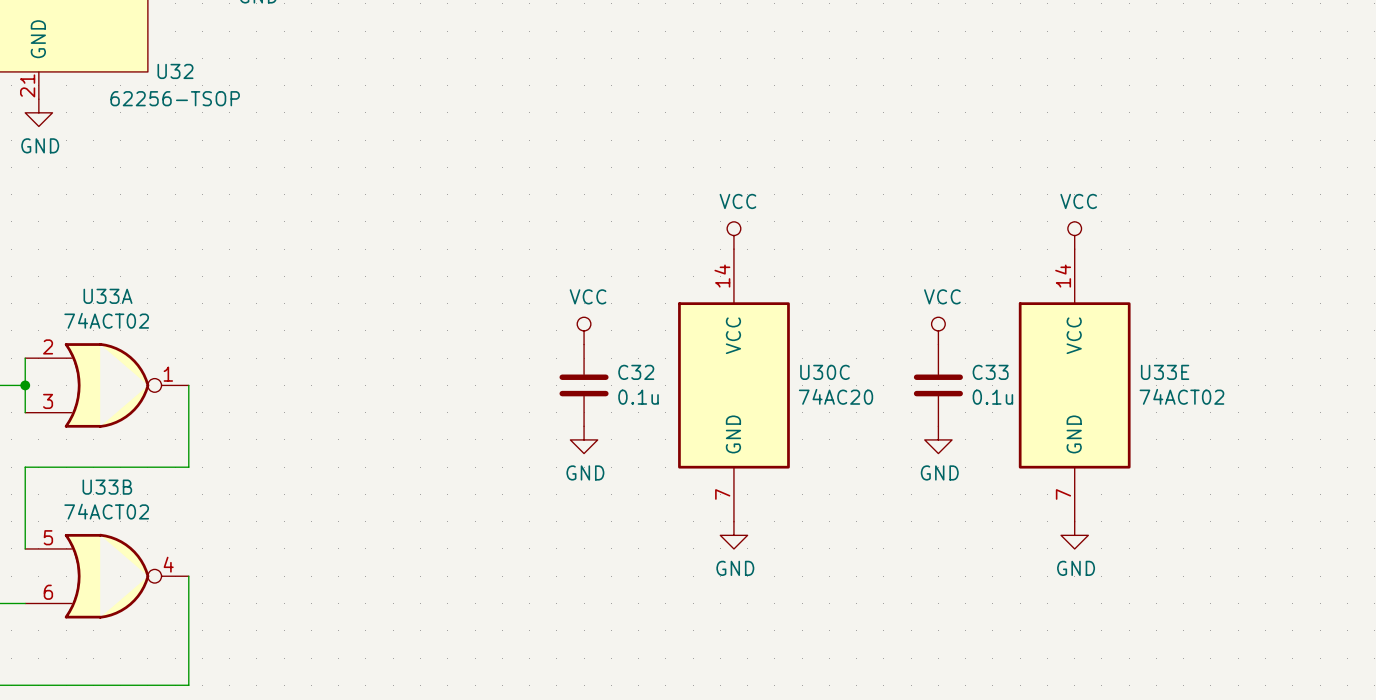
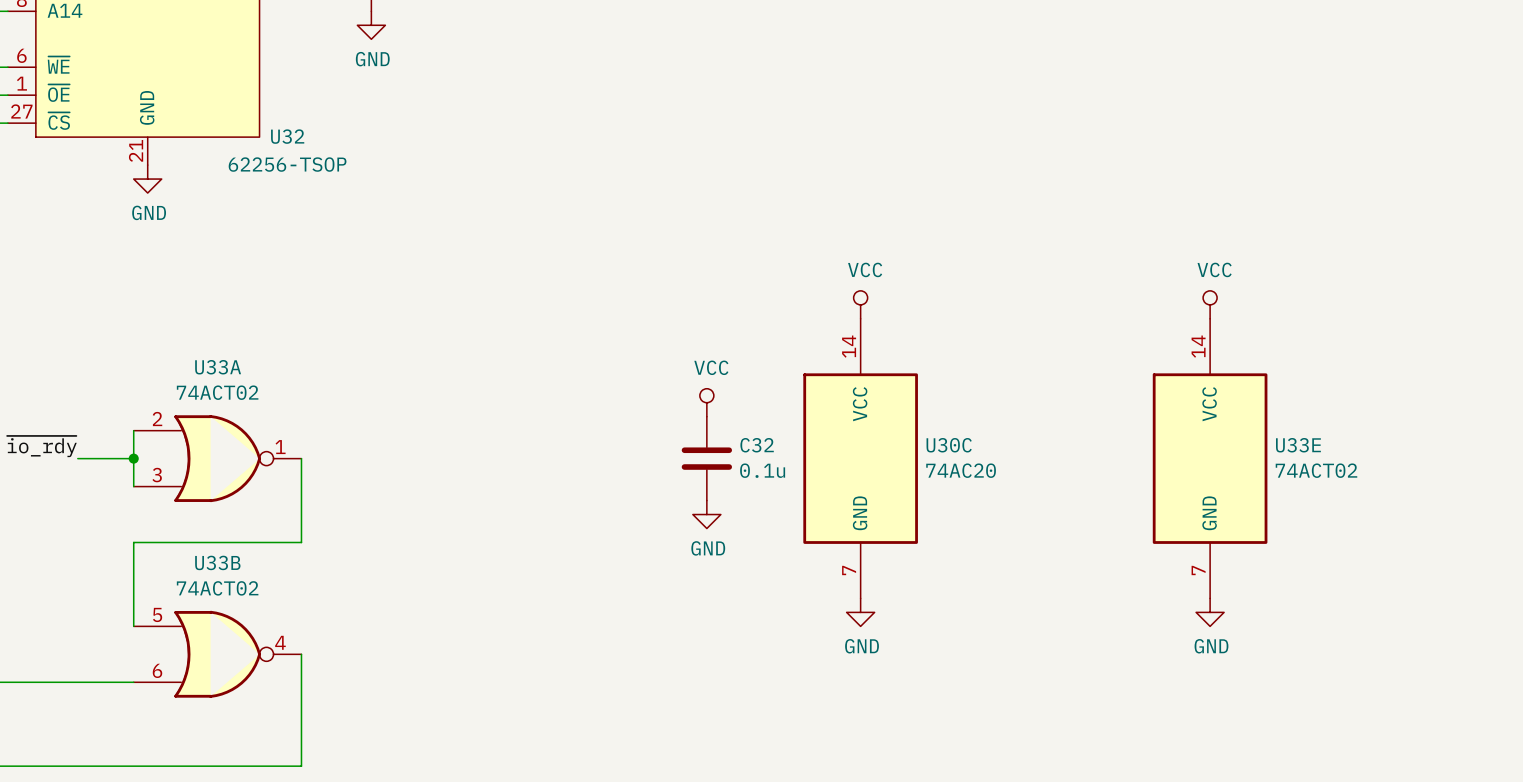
power symbol: VCC (938, 330) -> none
C33: 0.1u (938, 385) -> none
power symbol: GND (938, 439) -> none

